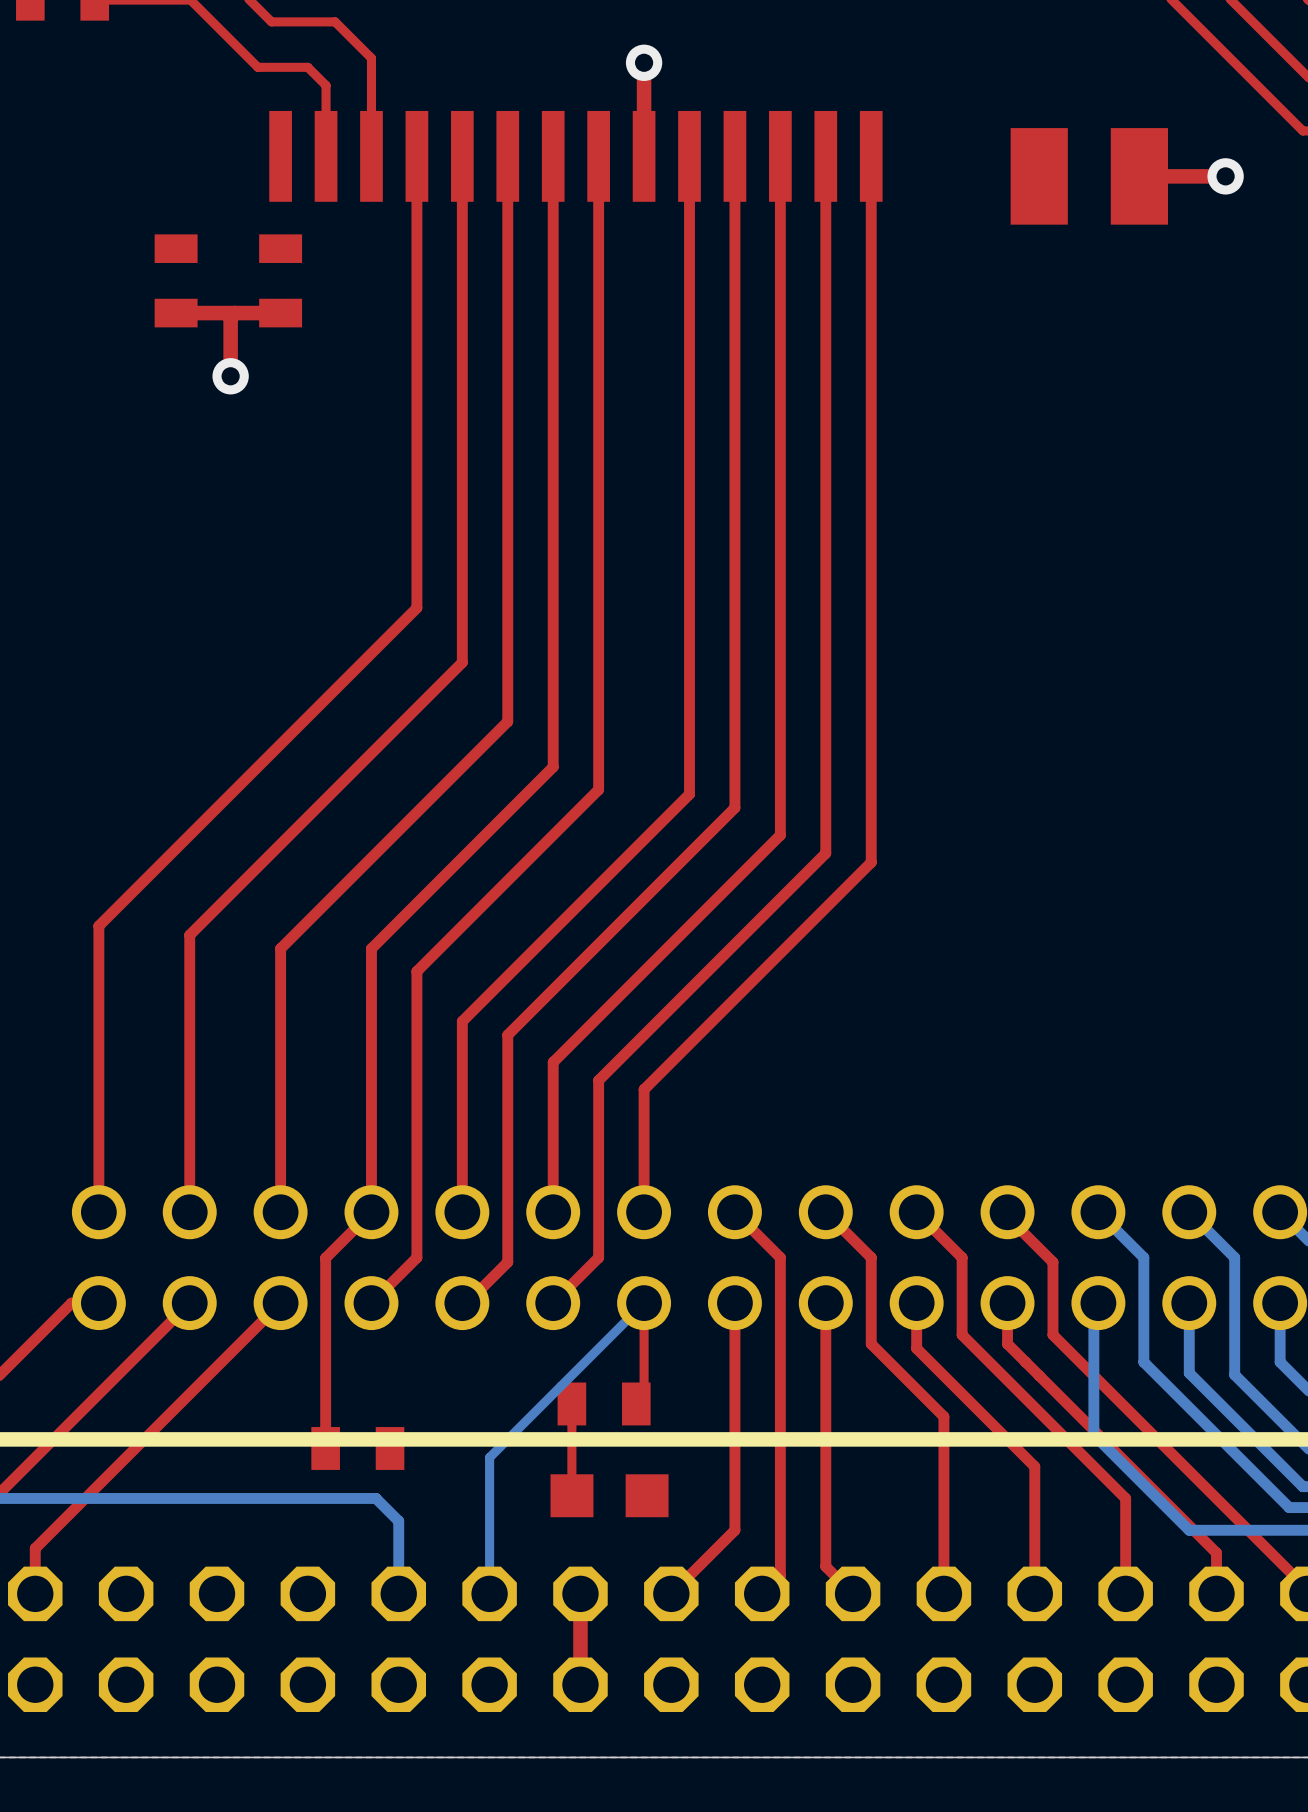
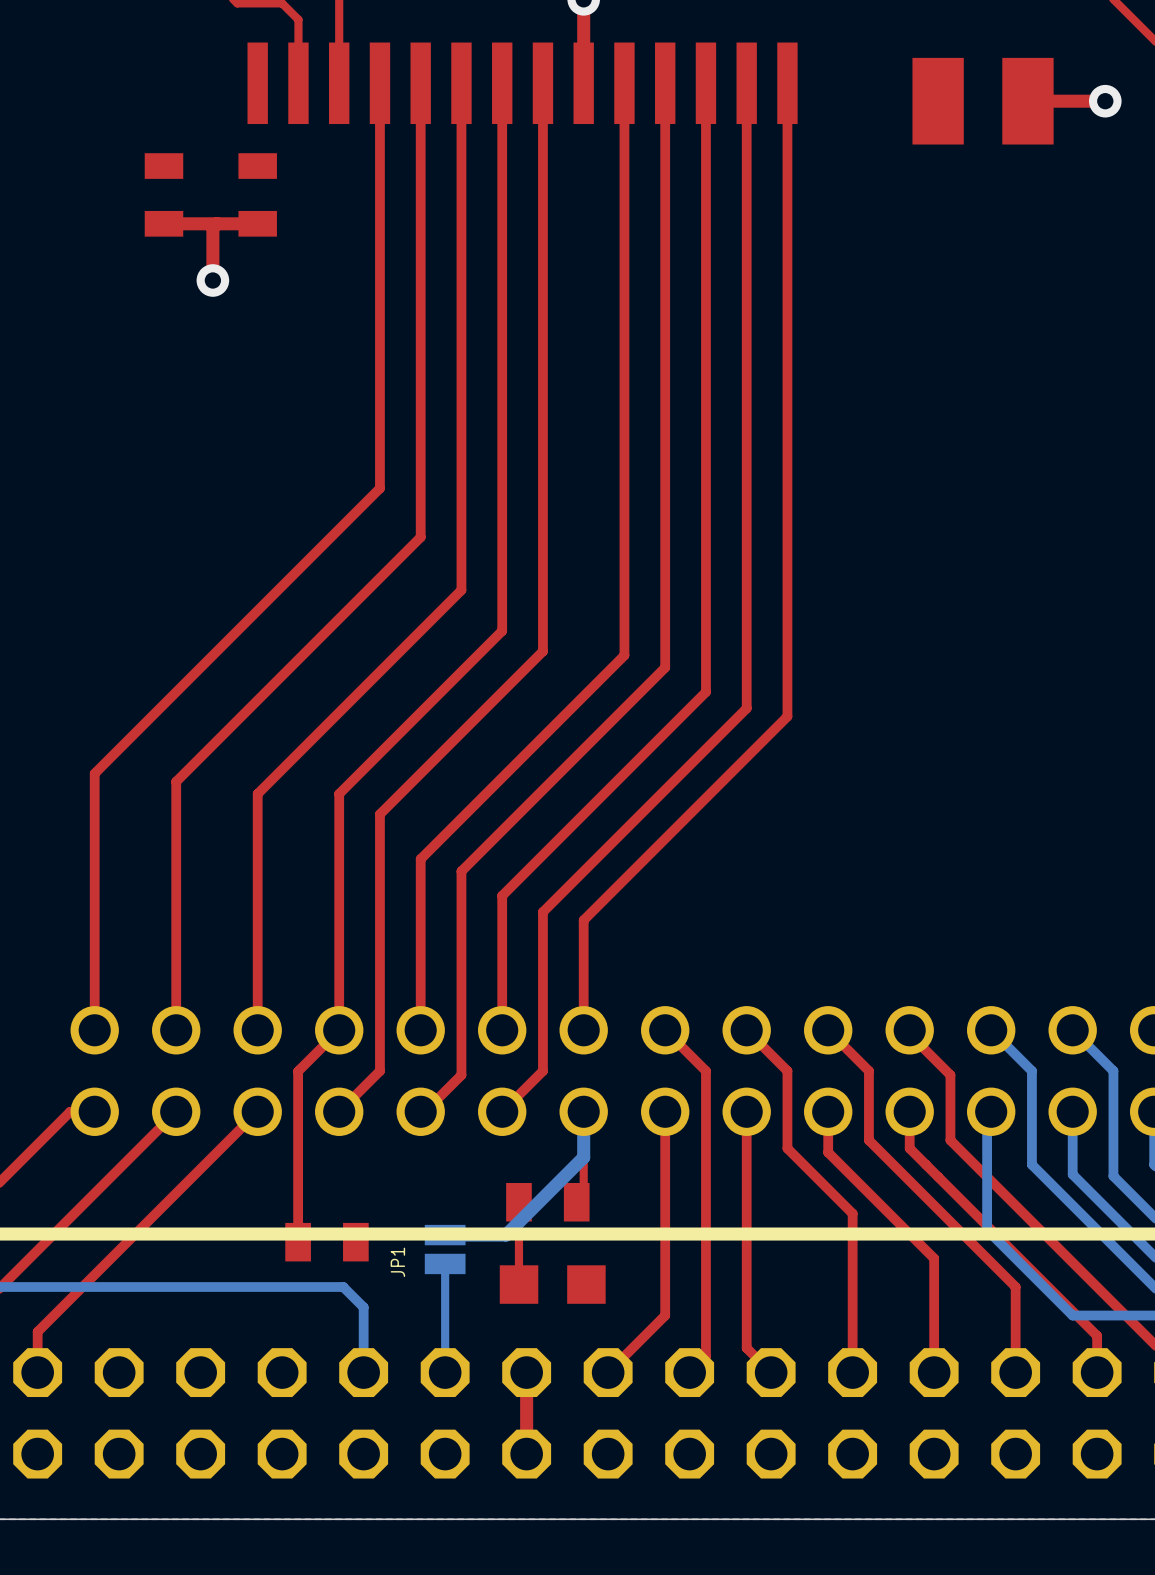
bottom track: (644, 1303) (489, 1457) (489, 1472) -> (583, 1111) (583, 1157) (506, 1235) (445, 1235)
JP1: none -> (445, 1249)

